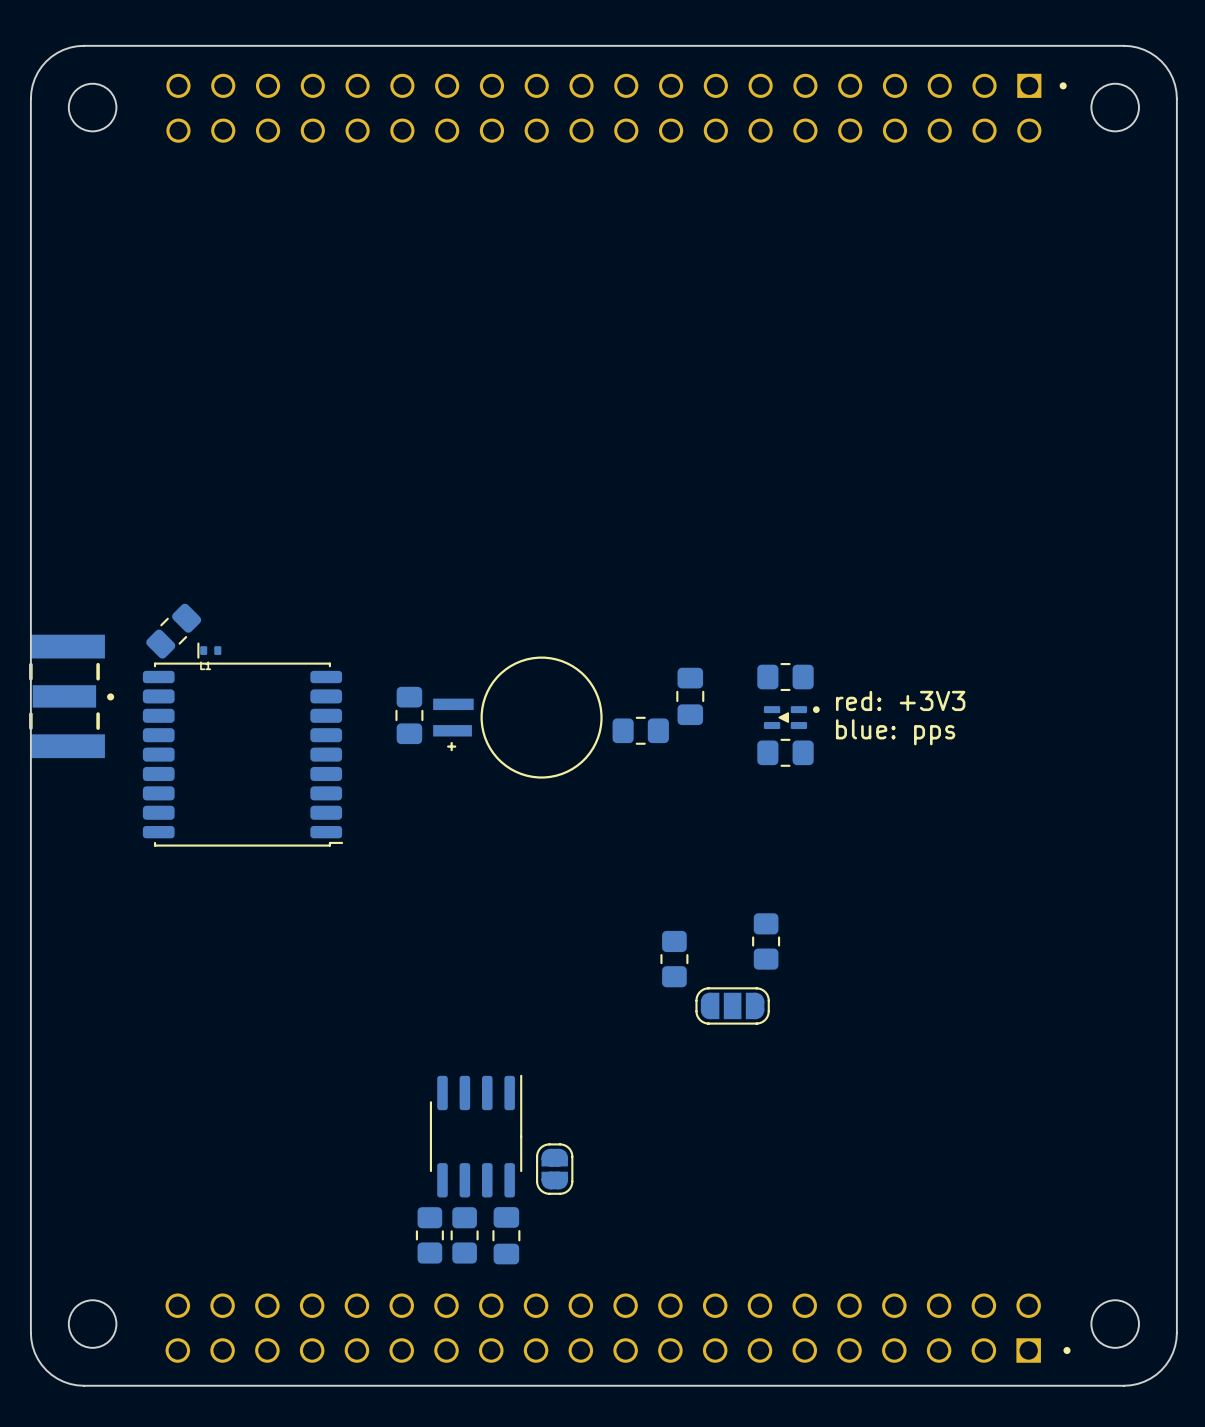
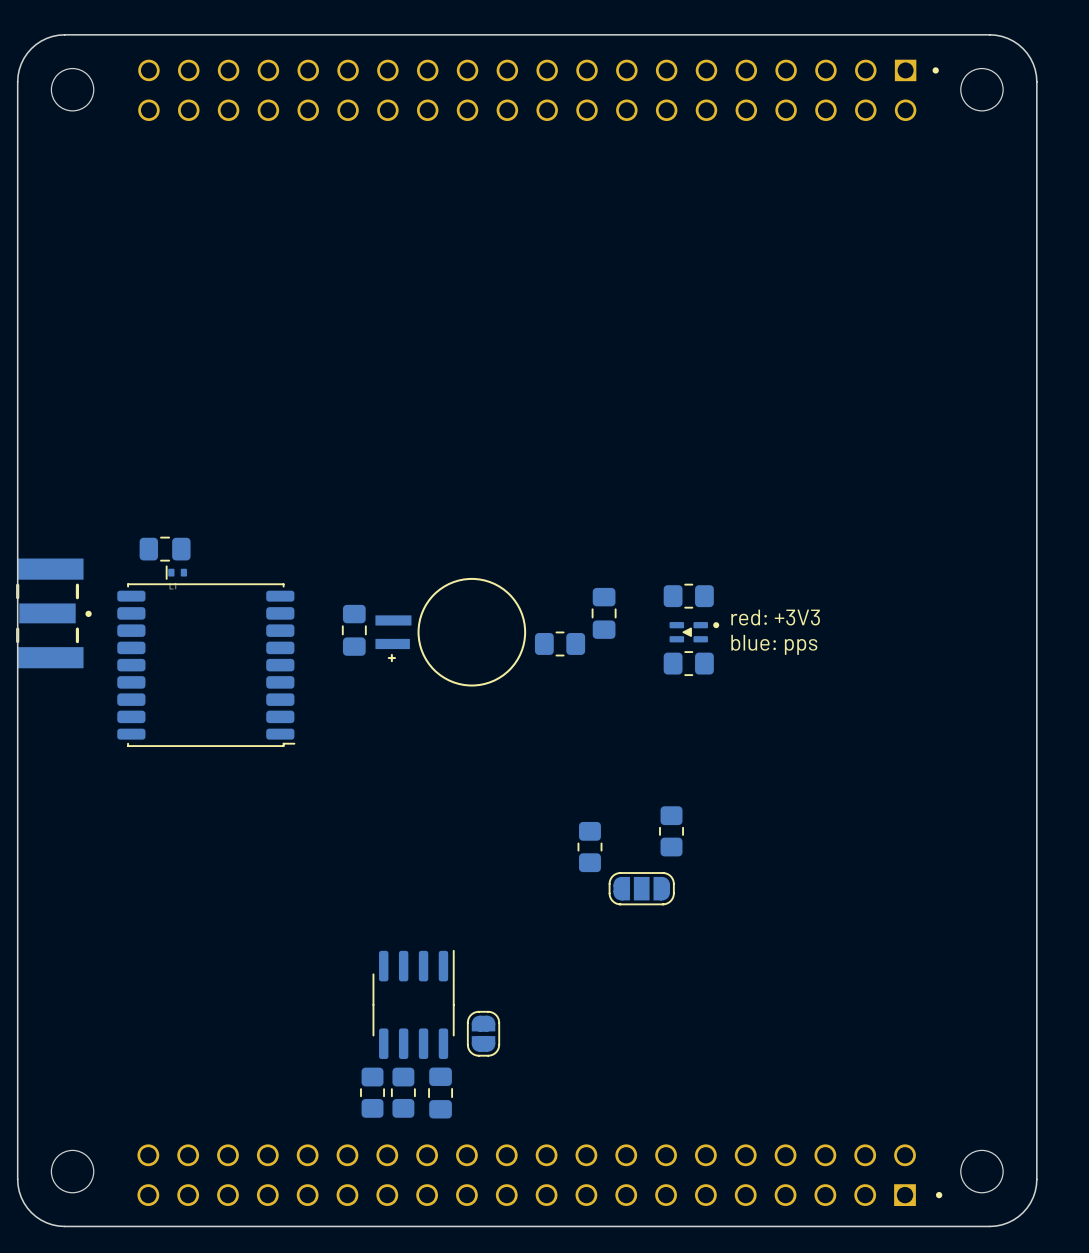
part: none -> (165, 549)
part: (173, 631) -> none

